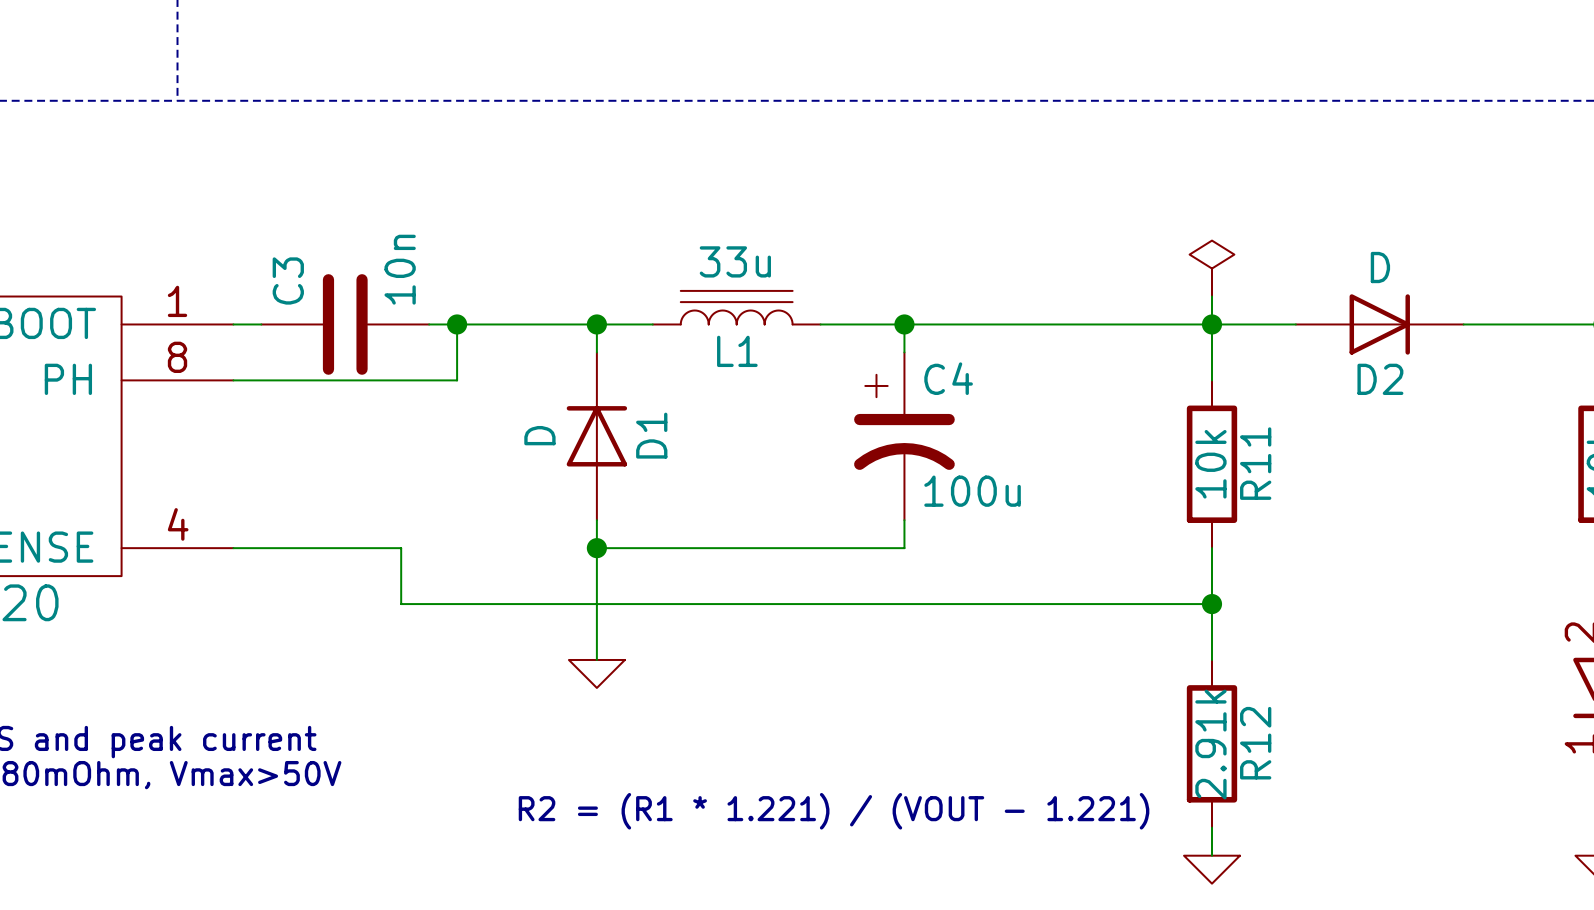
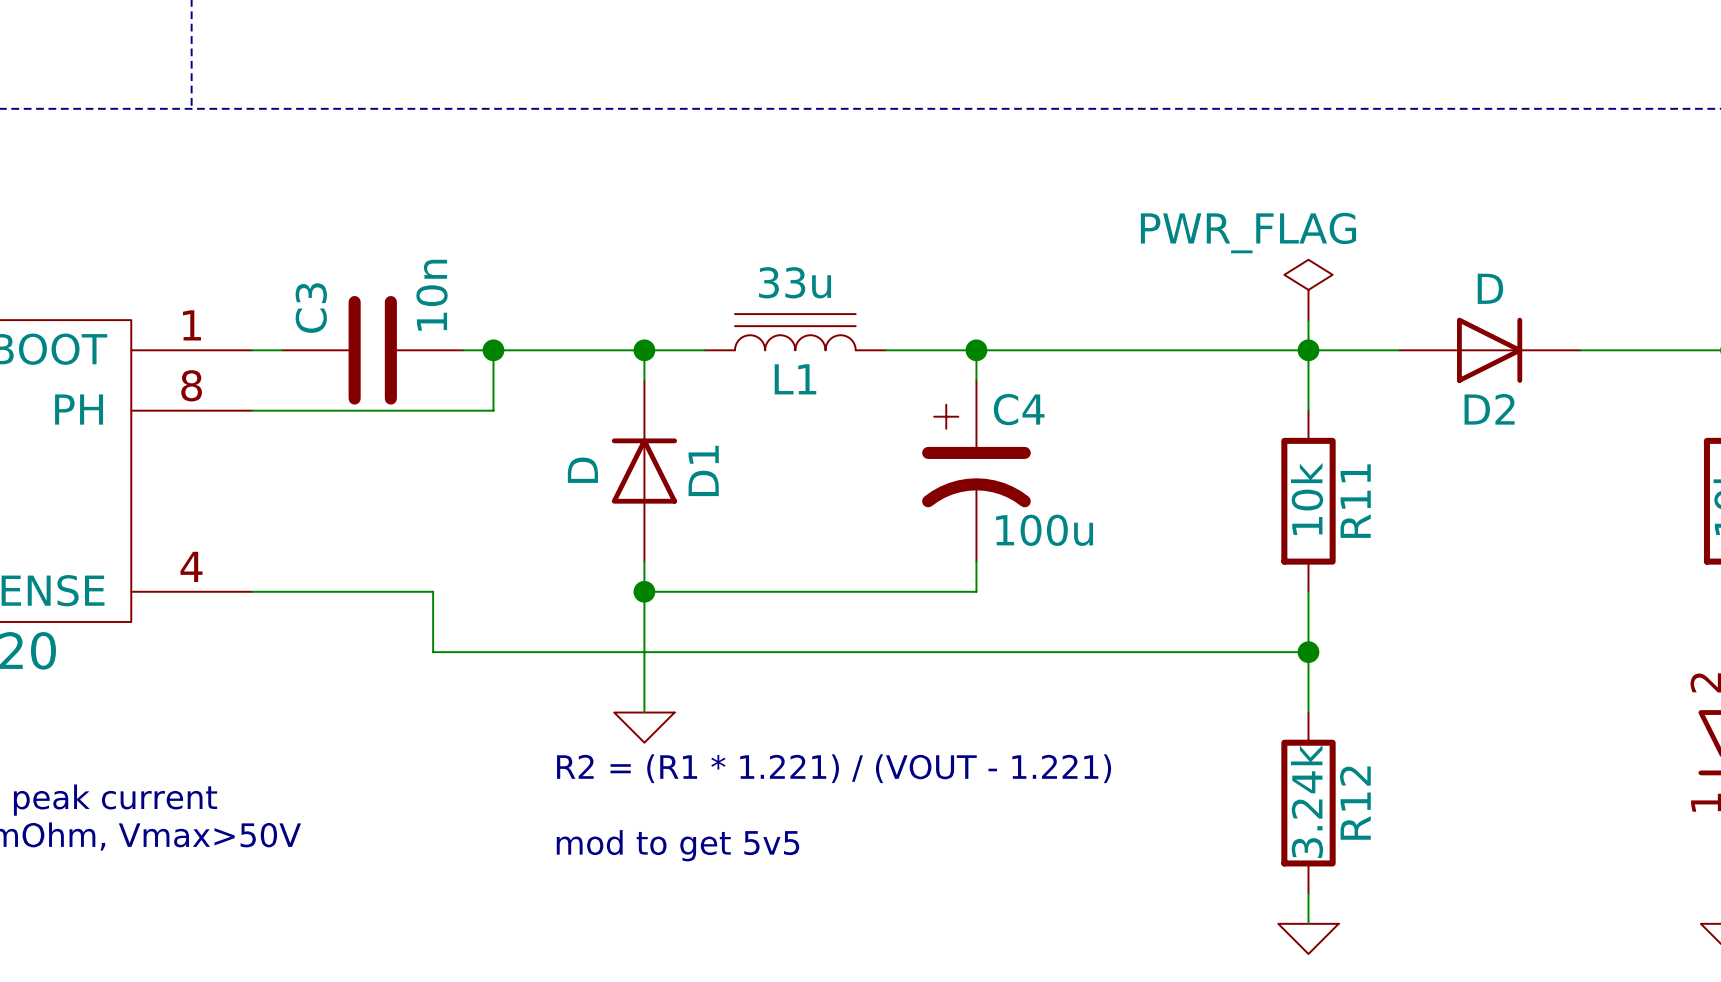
power symbol text: none -> PWR_FLAG (1248, 233)
R12 value: 2.91k (1210, 744) -> 3.24k (1307, 801)
text: none -> mod to get 5v5 (678, 845)
text position: R2 = (R1 * 1.221) / (VOUT - 1.221) (834, 811) -> R2 = (R1 * 1.221) / (VOUT - 1.221) (834, 768)

